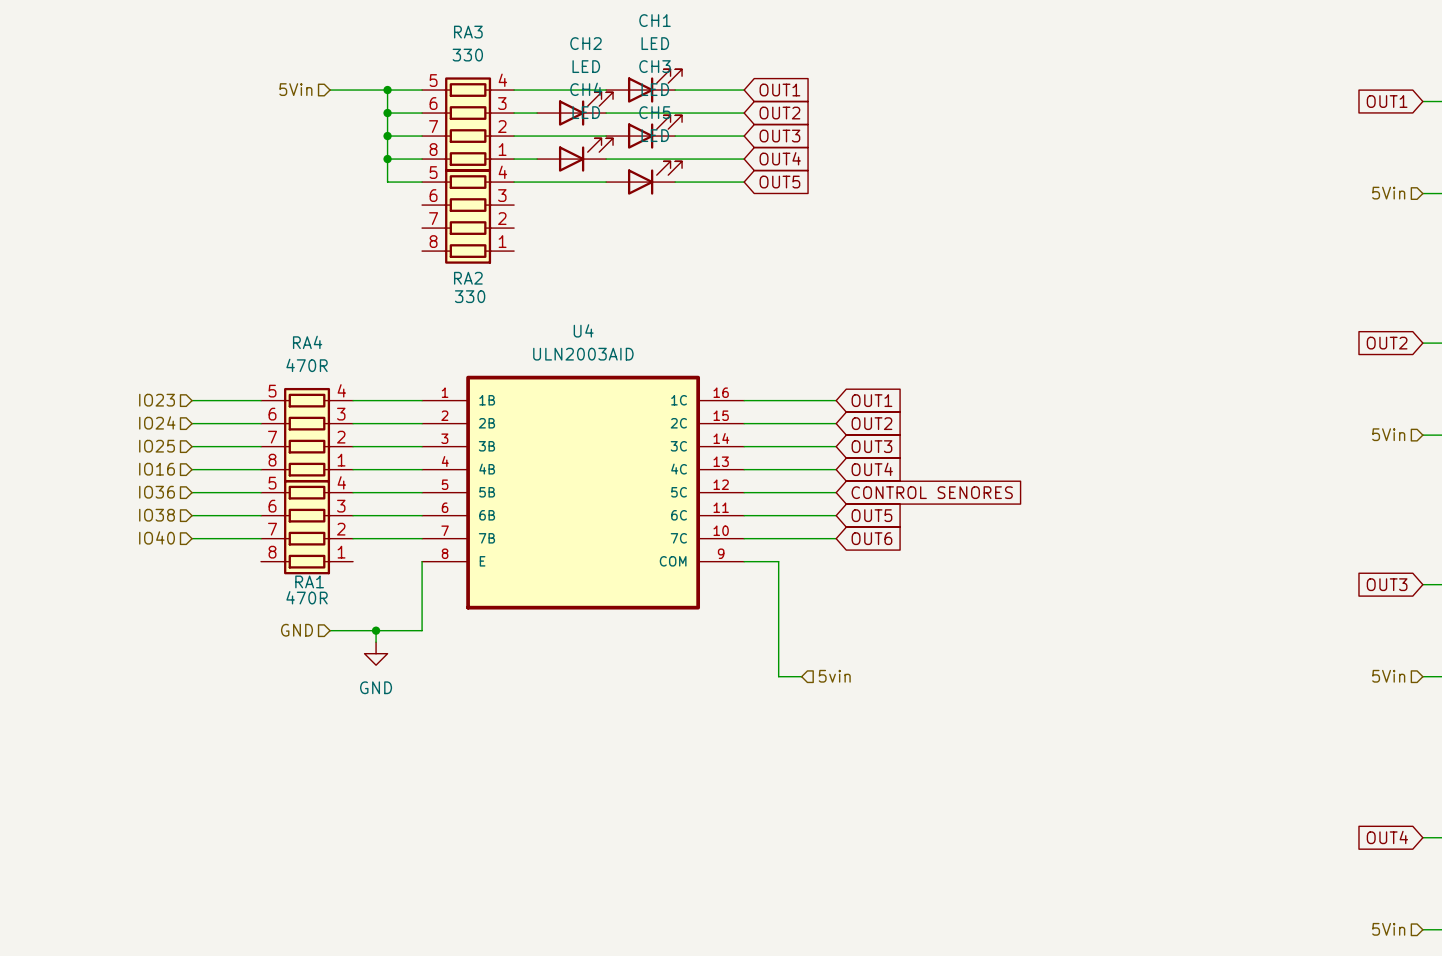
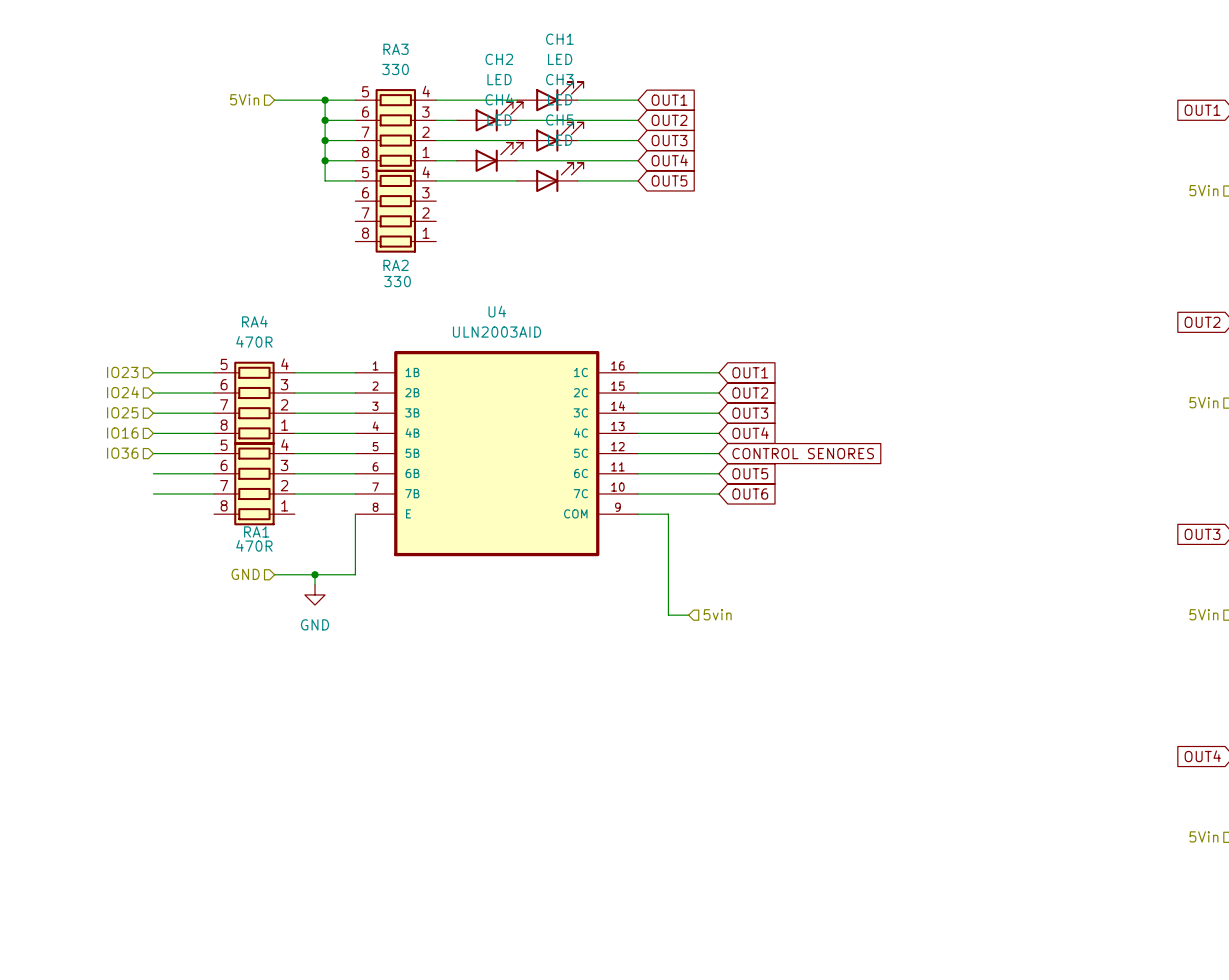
hierarchical label: IO38 (157, 515) -> none
hierarchical label: IO40 (157, 537) -> none

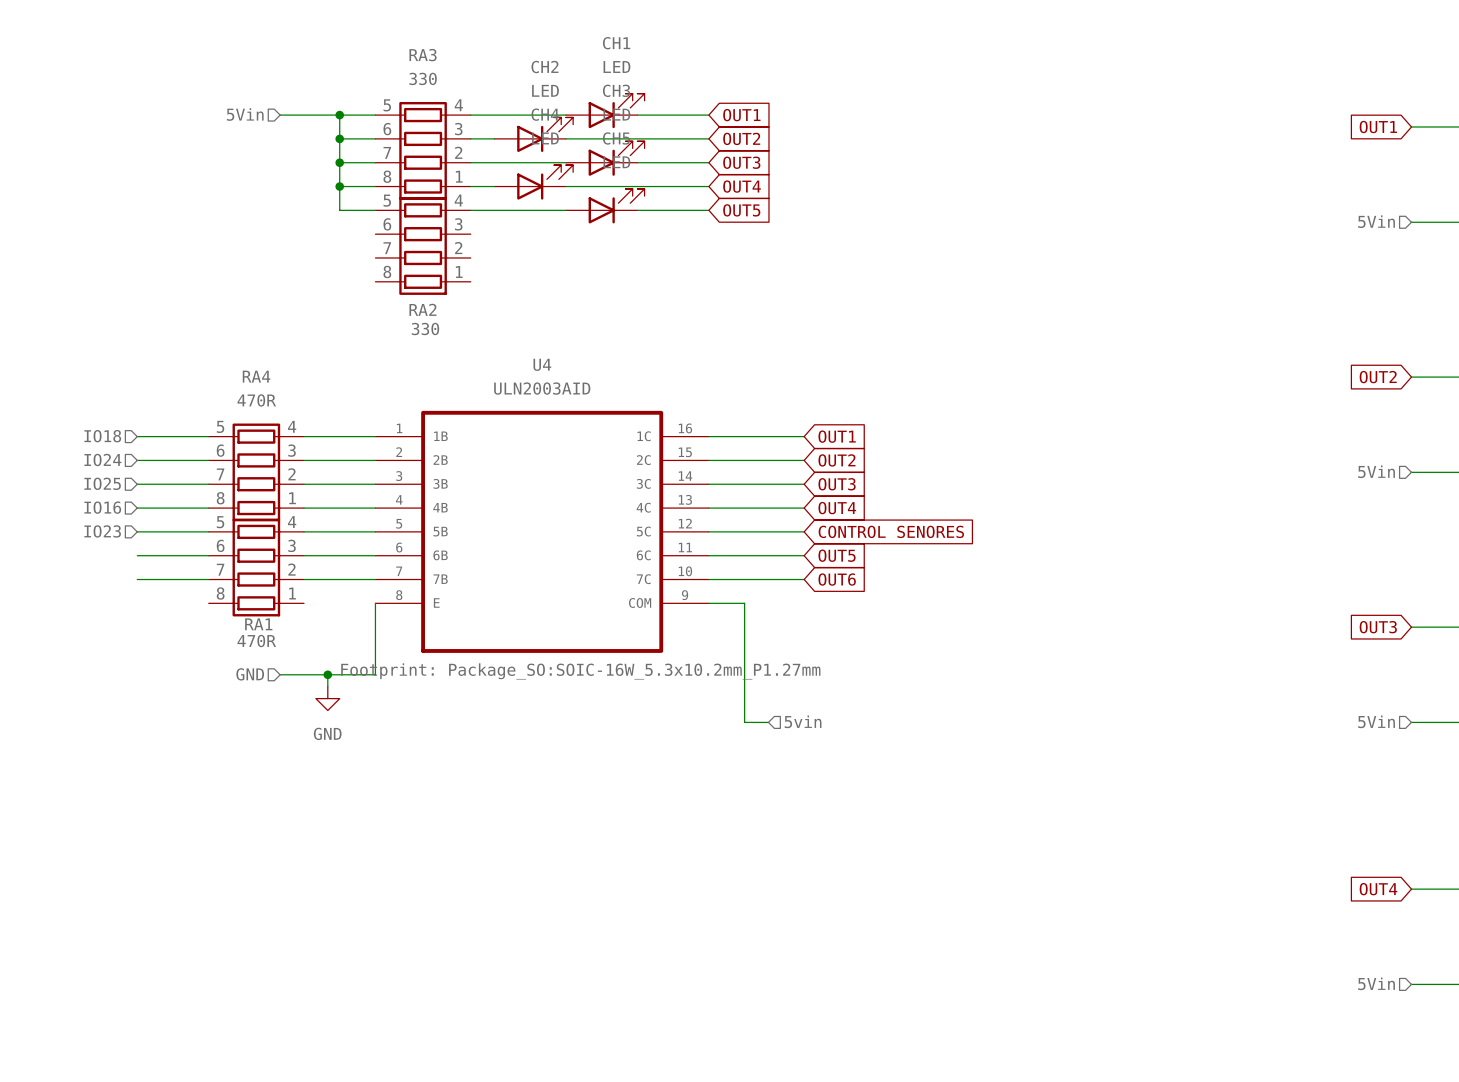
hierarchical label: IO23 (122, 372) -> IO18 (102, 436)
hierarchical label: IO36 (122, 453) -> IO23 (102, 531)
U4 text: none -> Footprint: Package_SO:SOIC-16W_5.3x10.2mm_P1.27mm (580, 671)

